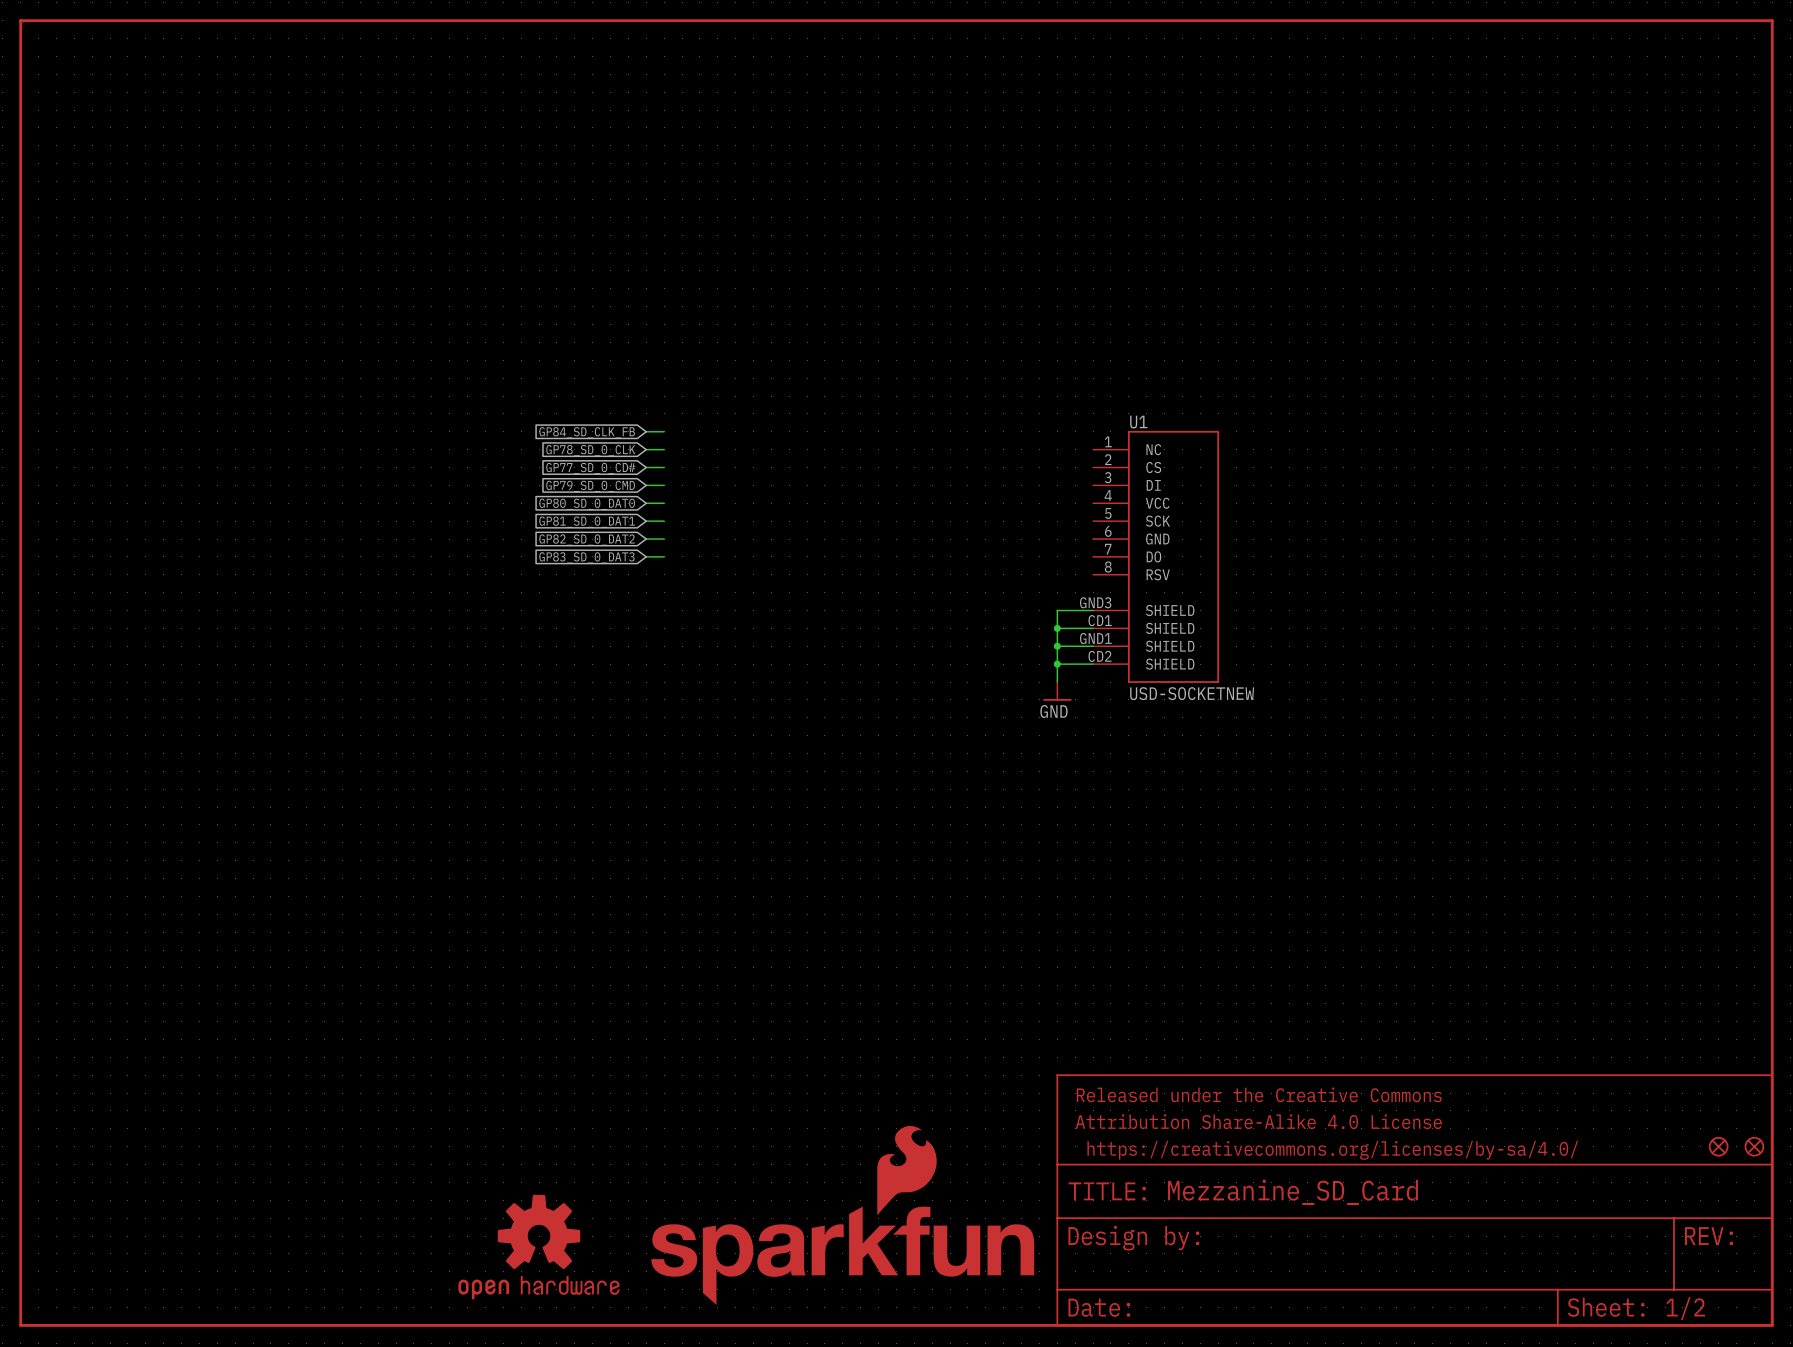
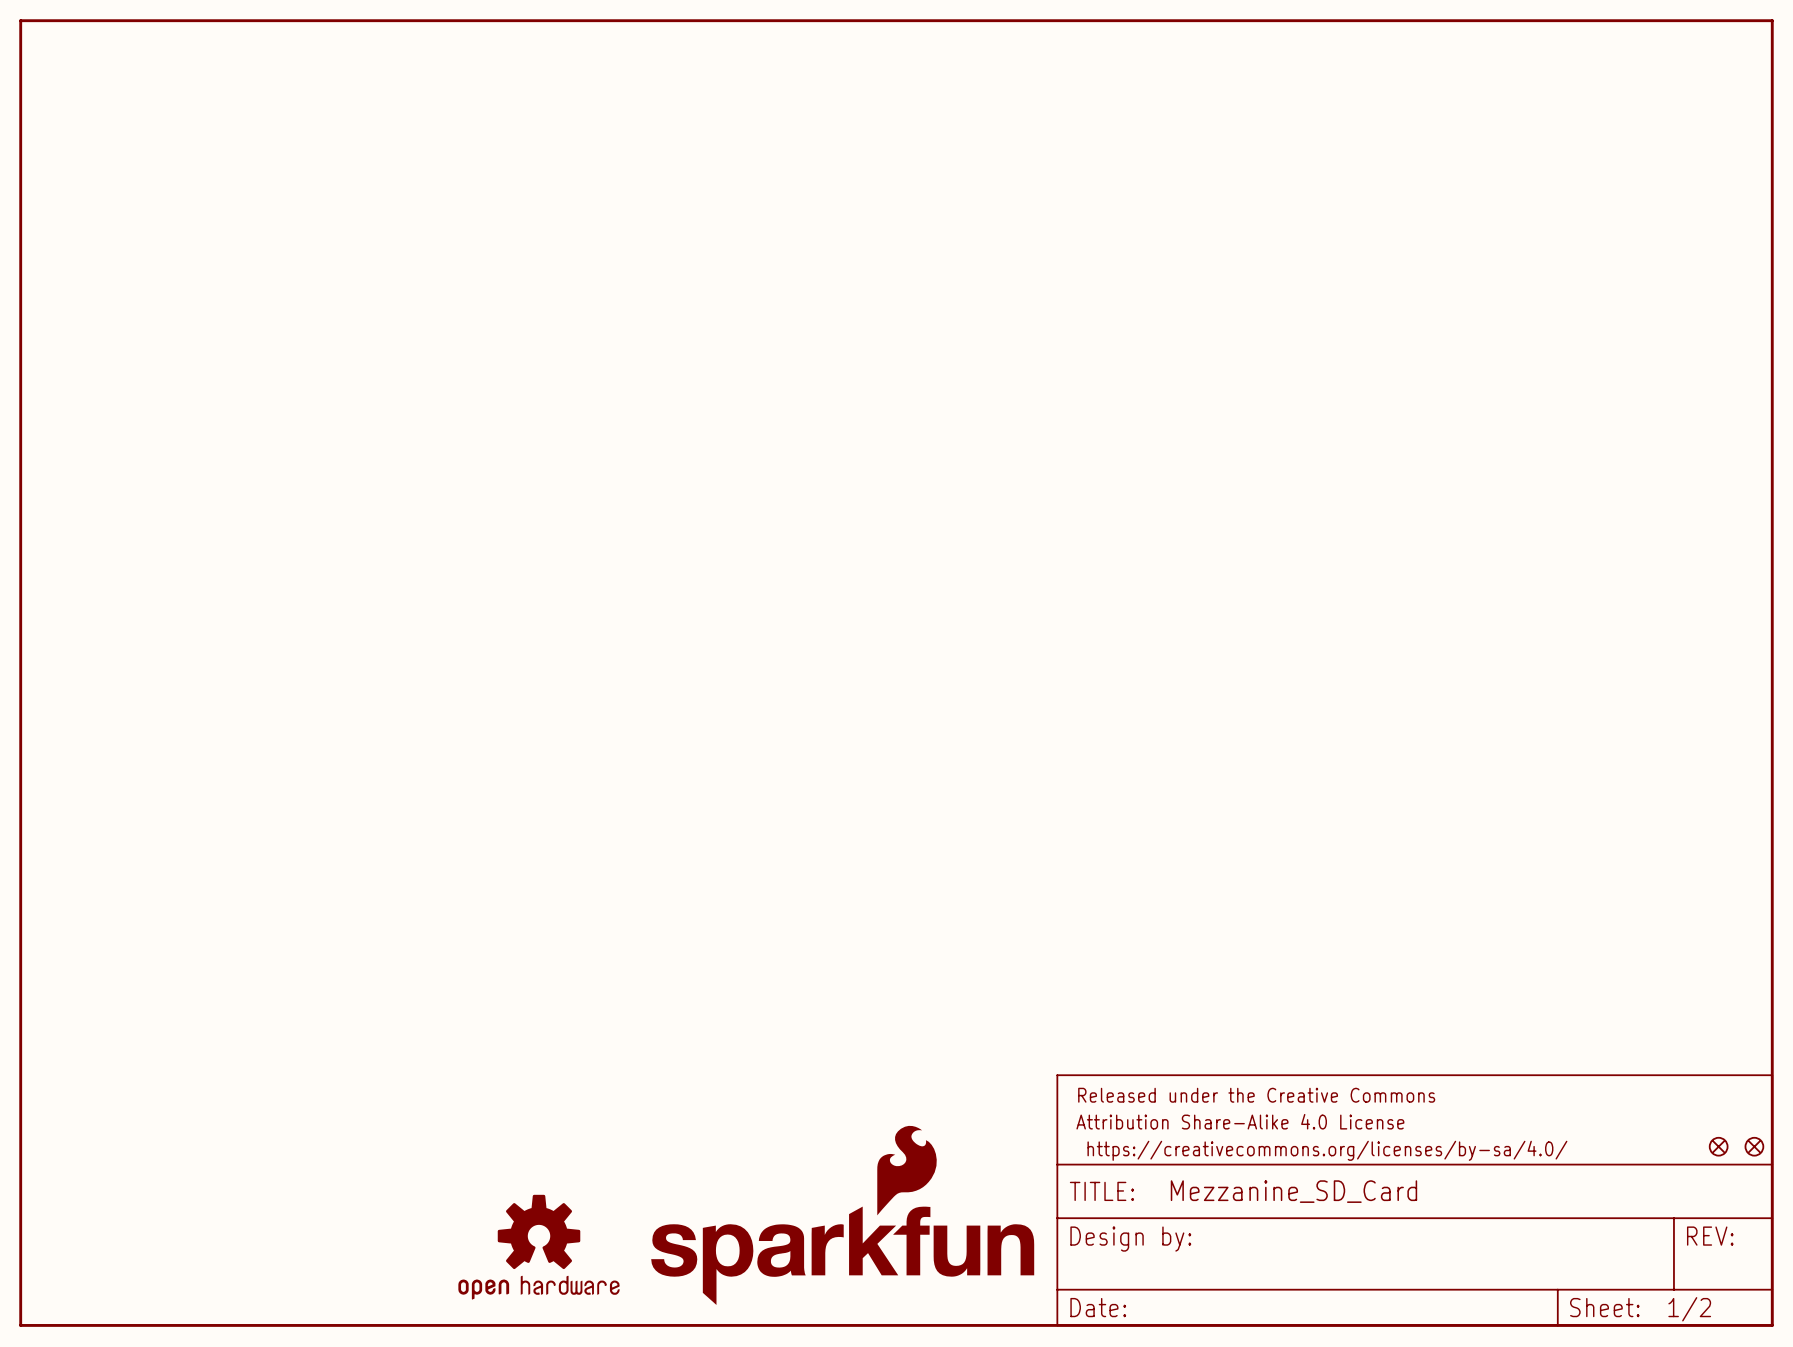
wire: (646, 431) (664, 431) -> none
global label: GP84_SD_CLK_FB (587, 432) -> none
wire: (646, 449) (664, 449) -> none
global label: GP78_SD_0_CLK (590, 450) -> none
wire: (646, 467) (664, 467) -> none
global label: GP77_SD_0_CD# (590, 468) -> none
wire: (646, 485) (664, 485) -> none
global label: GP79_SD_0_CMD (590, 486) -> none
wire: (646, 503) (664, 503) -> none
global label: GP80_SD_0_DAT0 (587, 504) -> none
wire: (646, 521) (664, 521) -> none
global label: GP81_SD_0_DAT1 (587, 522) -> none
wire: (646, 539) (664, 539) -> none
global label: GP82_SD_0_DAT2 (587, 540) -> none
wire: (646, 556) (664, 556) -> none
U1: USD-SOCKETNEW (1156, 556) -> none
global label: GP83_SD_0_DAT3 (586, 557) -> none
wire: (1093, 610) (1057, 610) (1057, 682) -> none
wire: (1057, 628) (1093, 628) -> none
junction: (1057, 628) -> none
wire: (1057, 646) (1093, 646) -> none
junction: (1057, 646) -> none
wire: (1057, 664) (1093, 664) -> none
junction: (1057, 664) -> none
power symbol: GND (1057, 691) -> none

